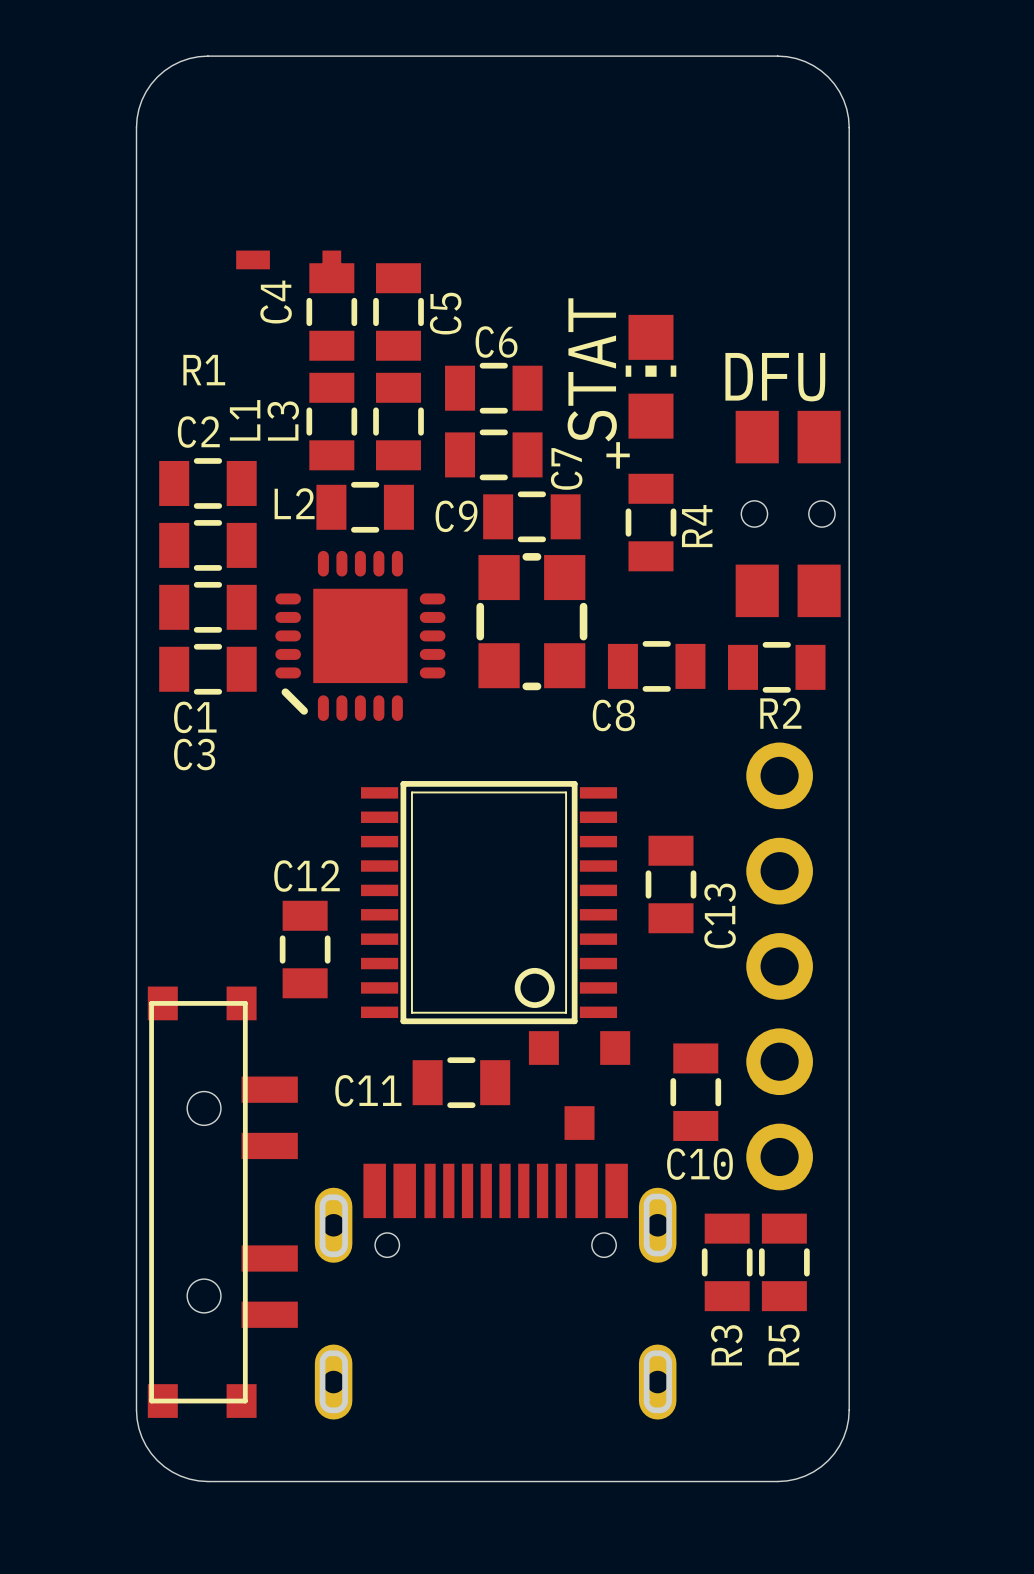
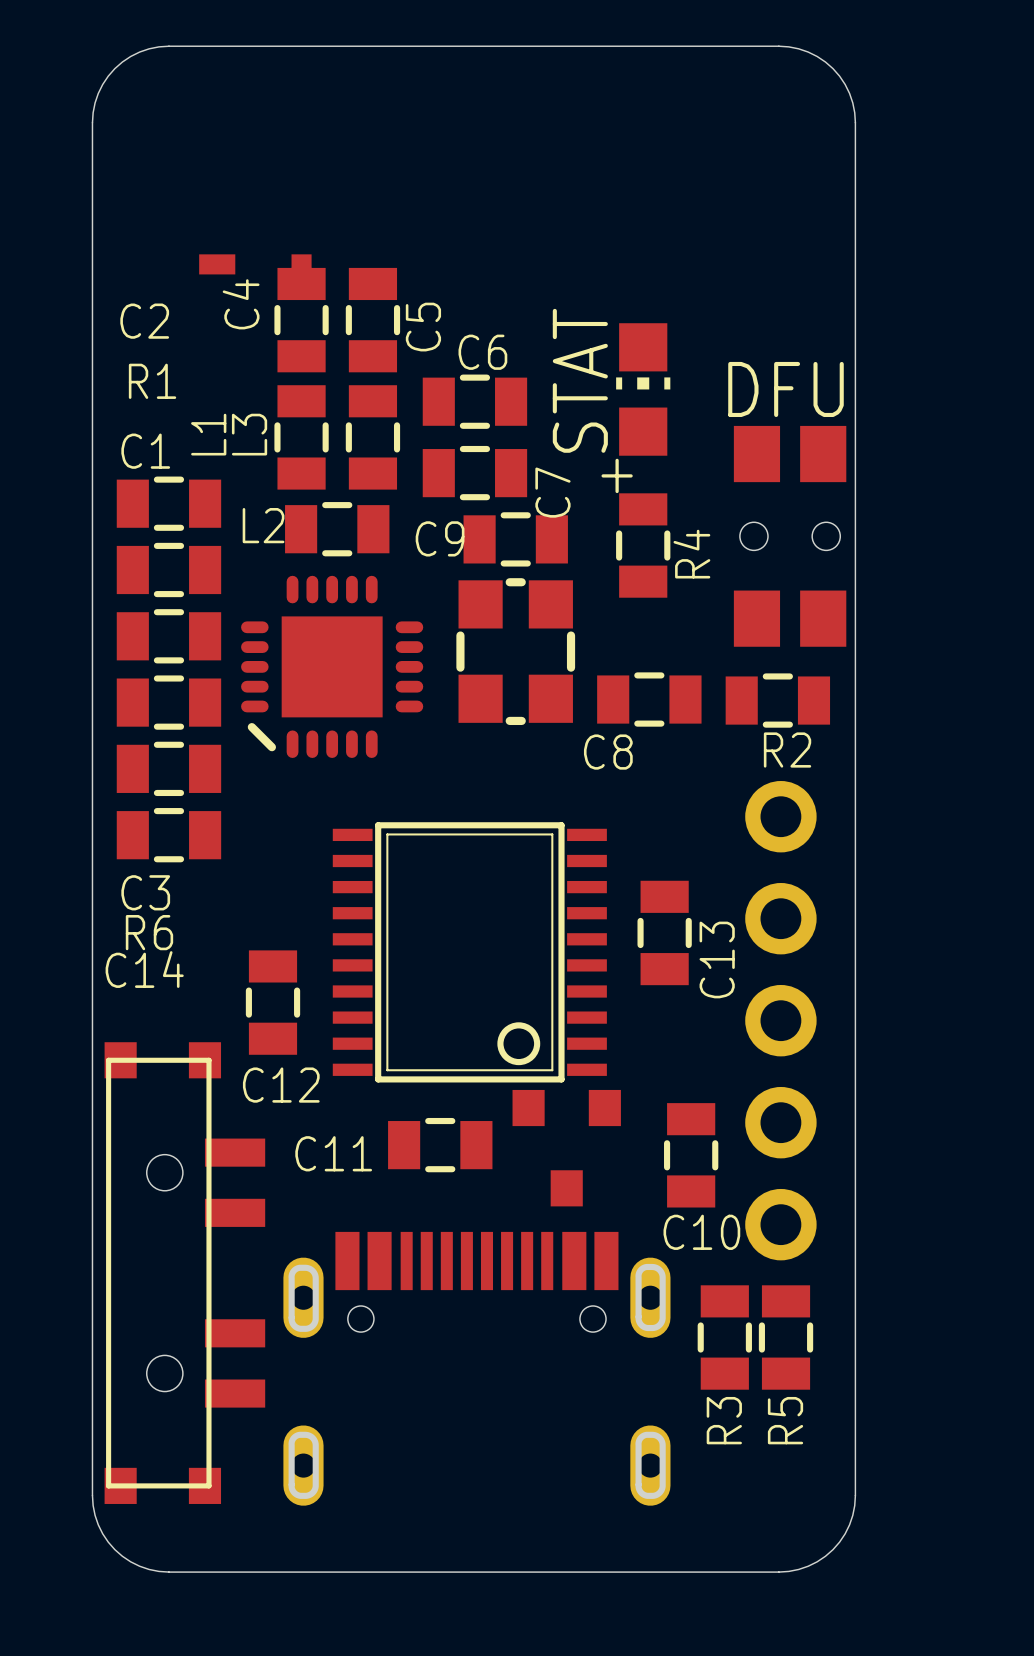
R1 name: R1 (204, 370) -> C2 (144, 321)
C2 name: C2 (198, 432) -> R1 (152, 381)
C1 name position: C1 (195, 717) -> C1 (145, 451)
R6: none -> (168, 768)
C3 name position: C3 (194, 754) -> C3 (145, 892)
C14: none -> (168, 835)
C12 name position: C12 (306, 876) -> C12 (281, 1085)

